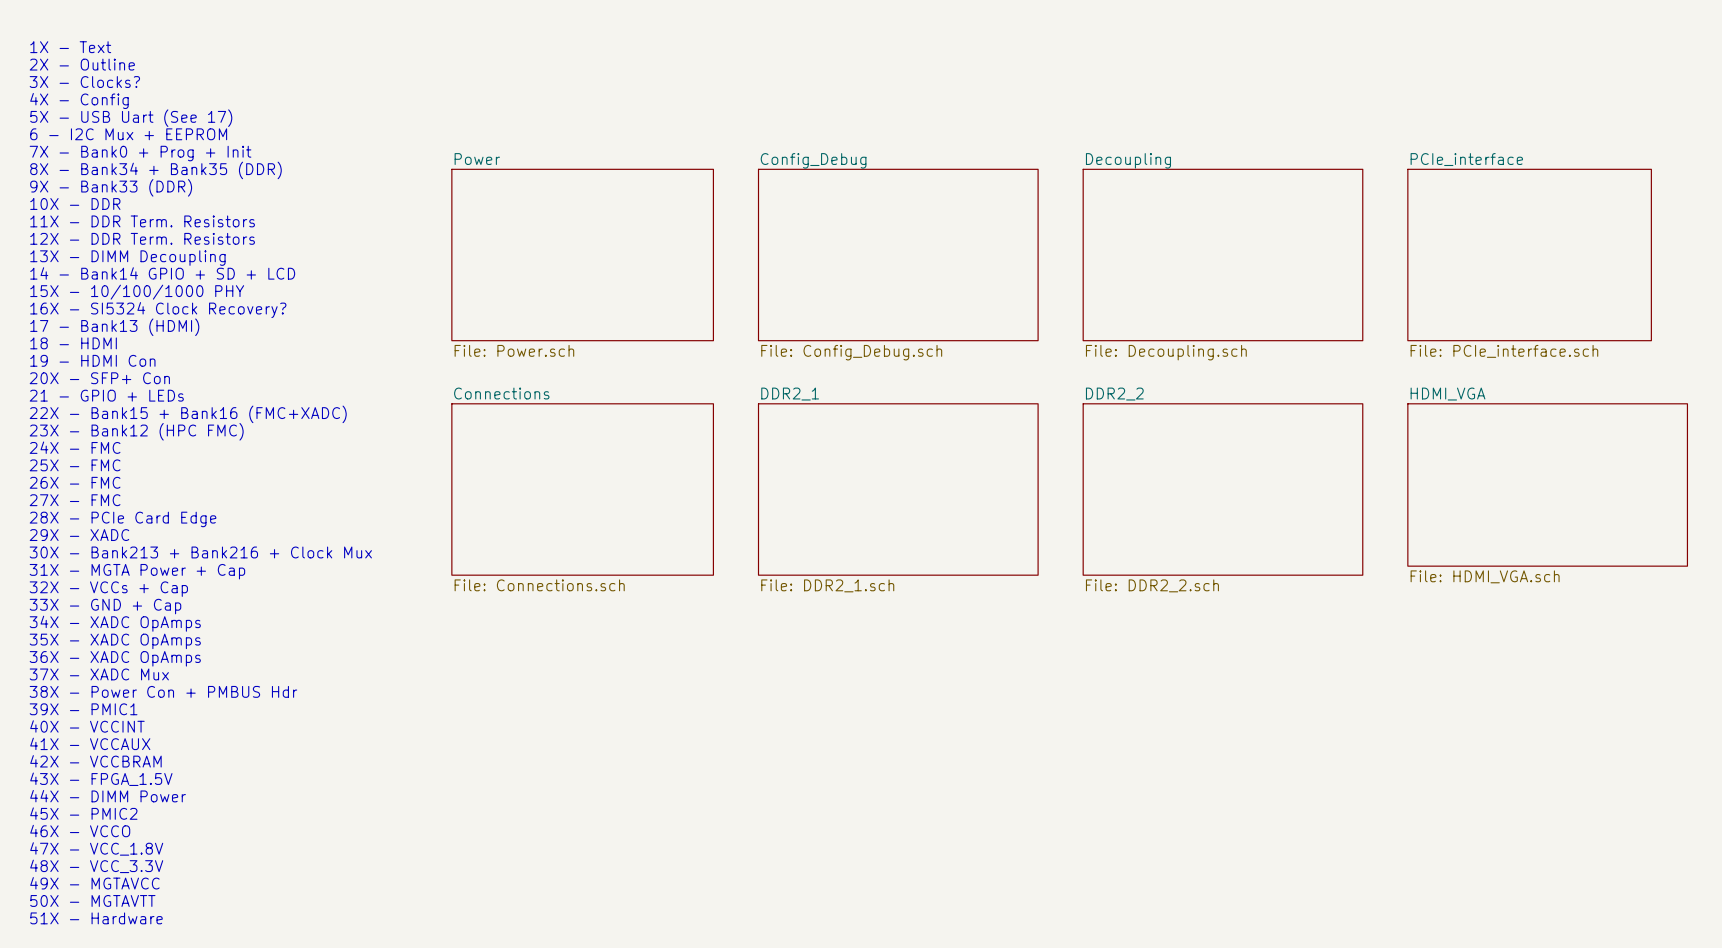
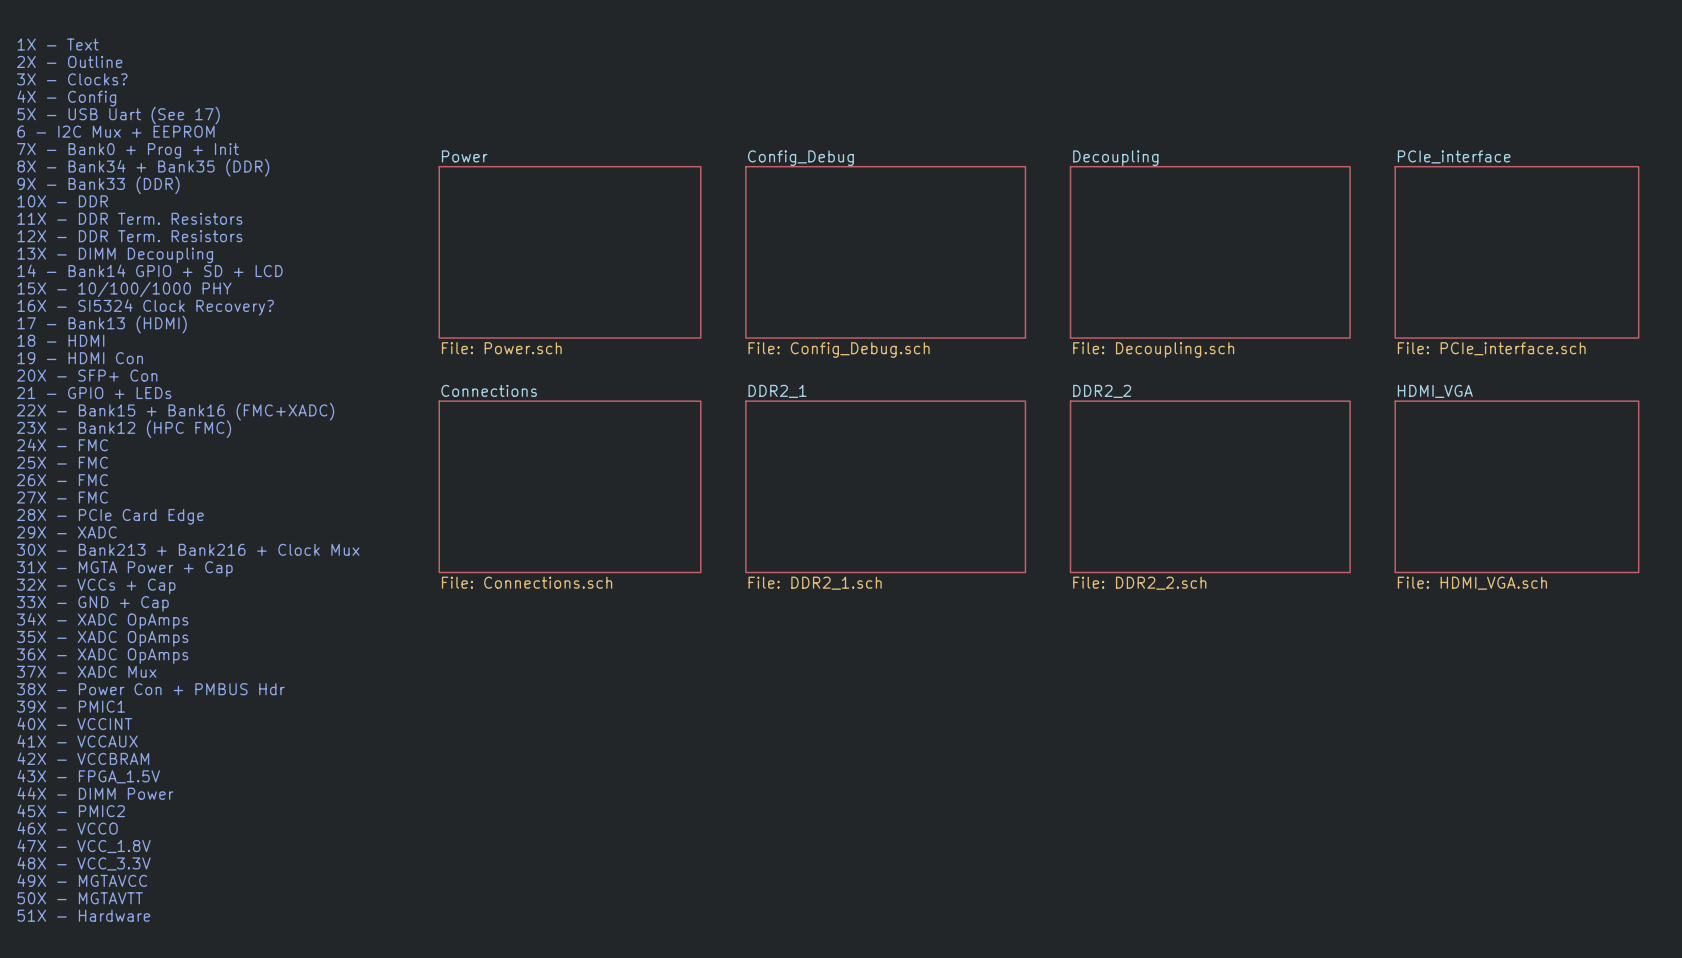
sheet HDMI_VGA: File: HDMI_VGA.sch (1547, 484) -> none
sheet HDMI_VGA: none -> File: HDMI_VGA.sch (1516, 486)

